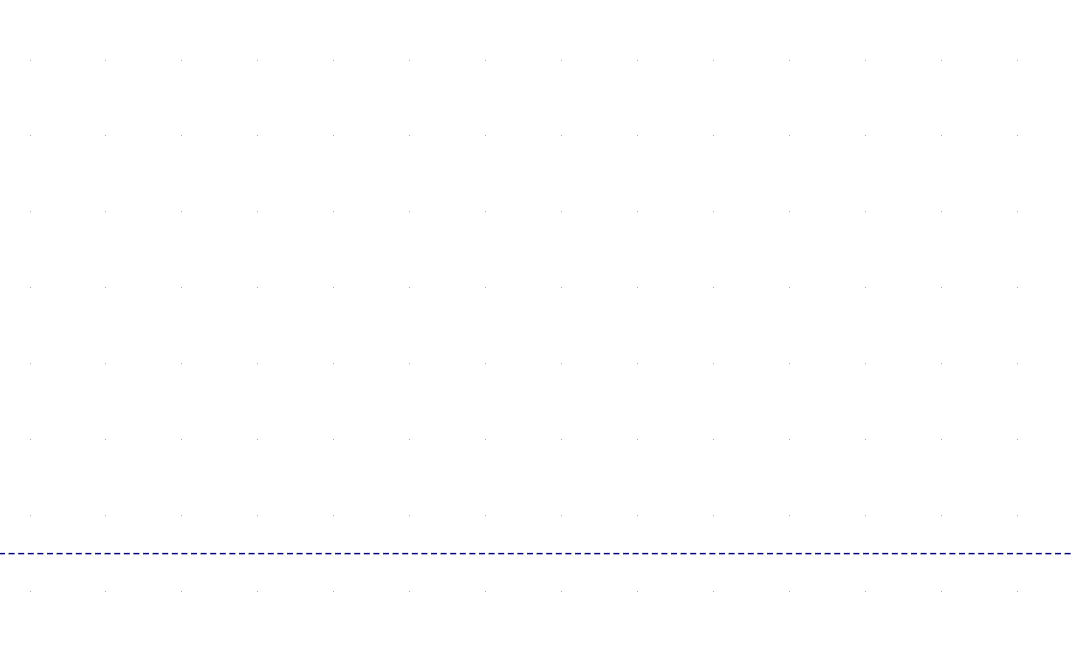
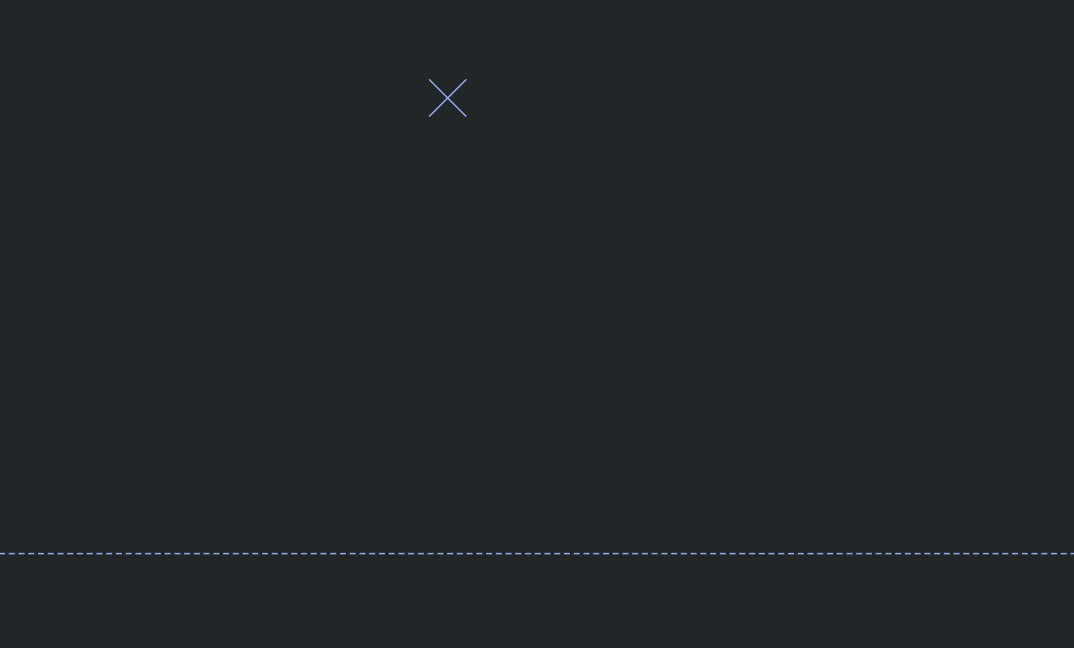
no-connect mark: none -> (447, 98)

